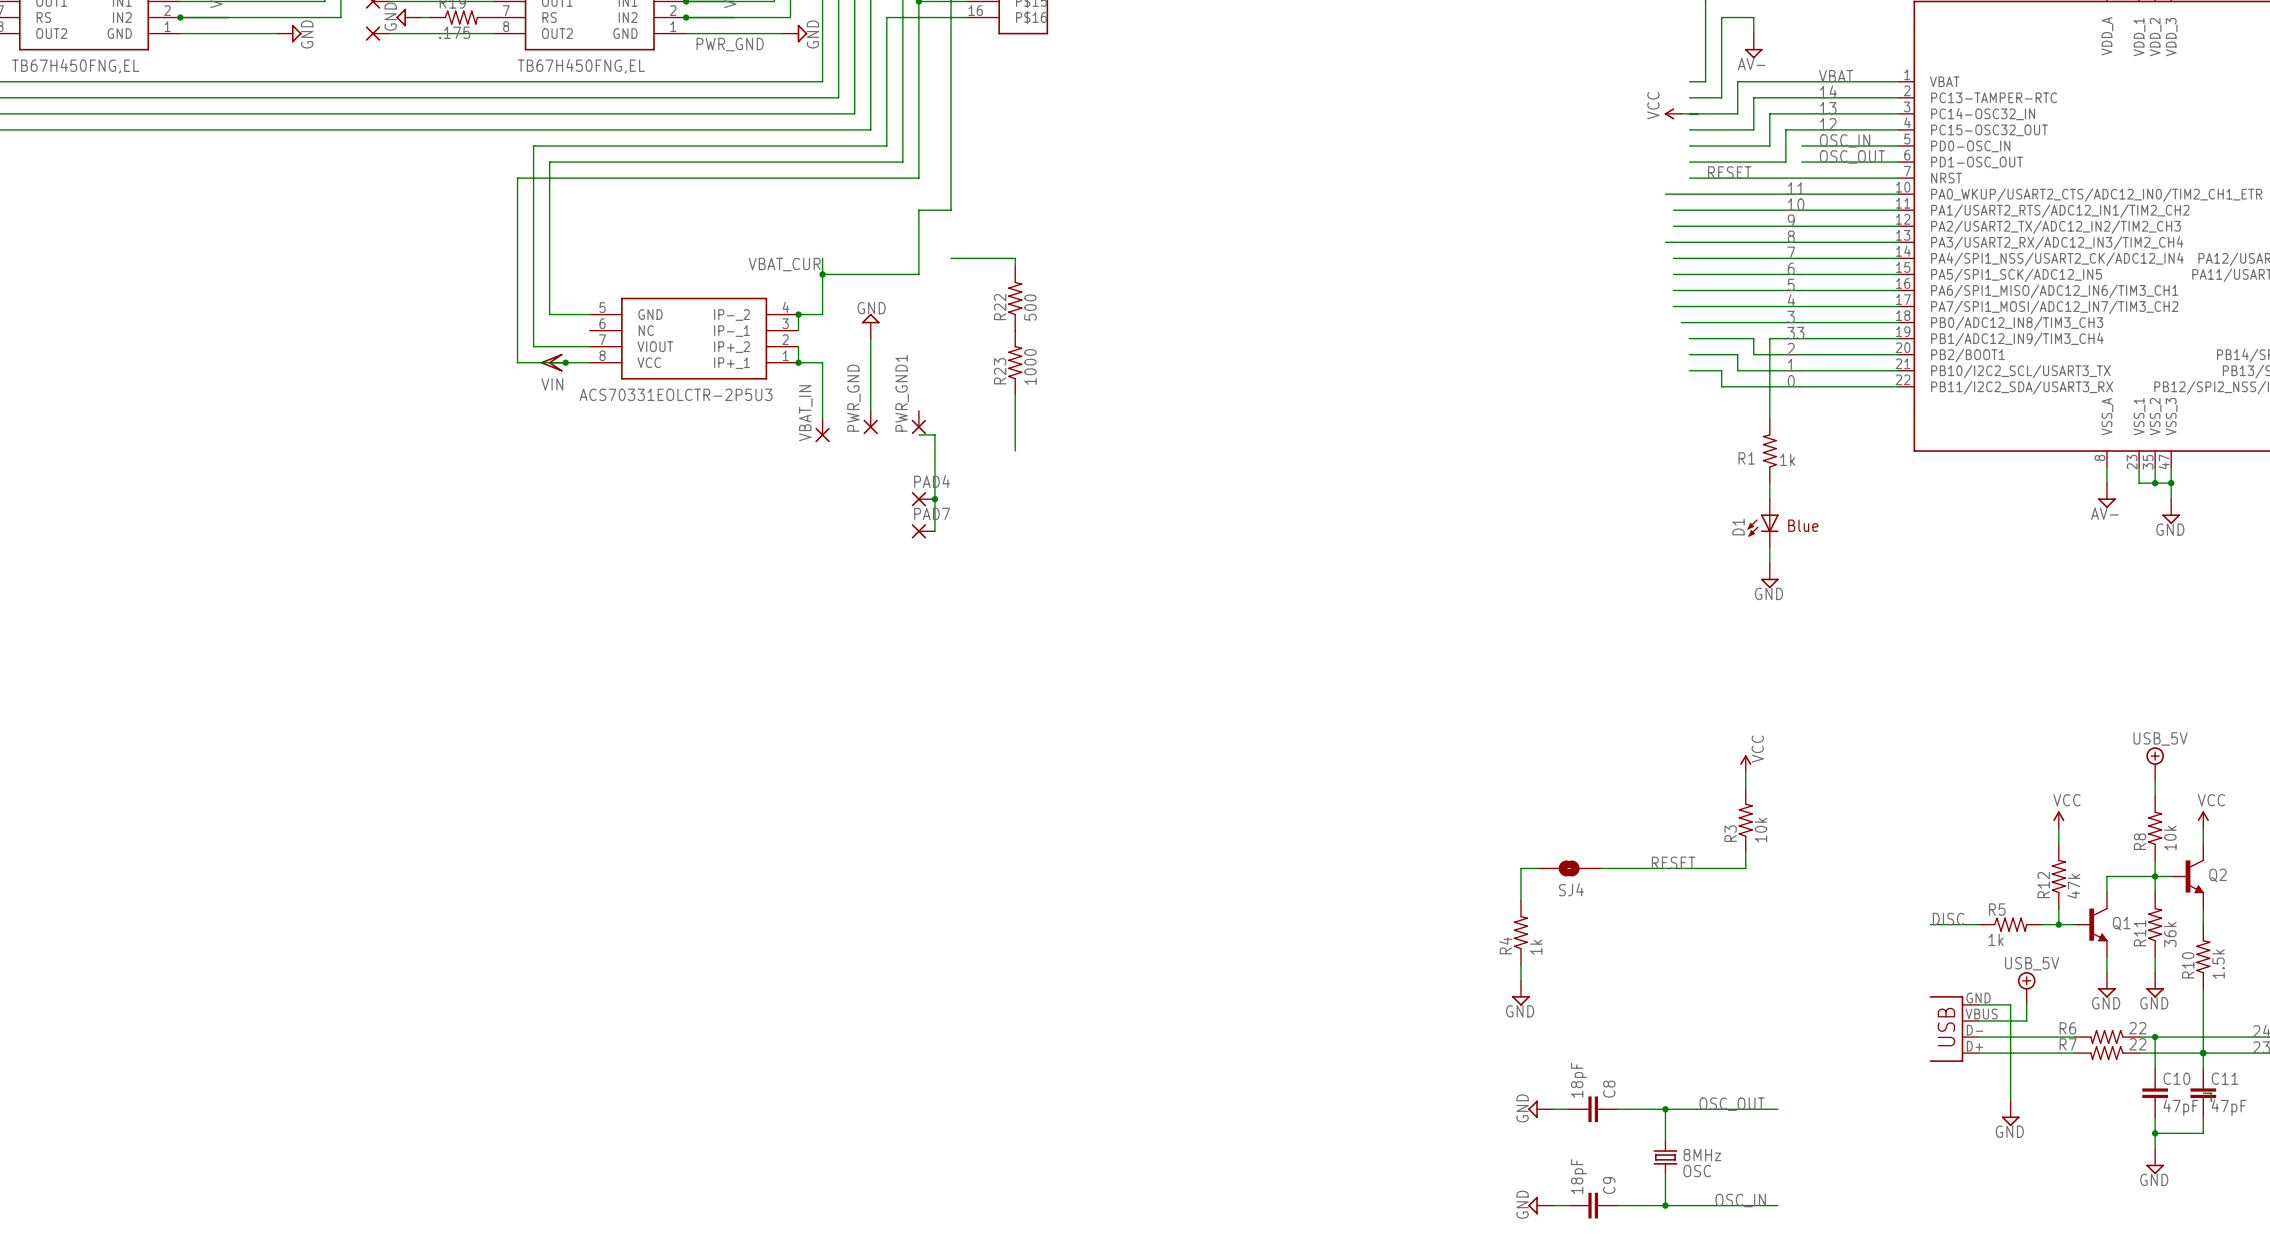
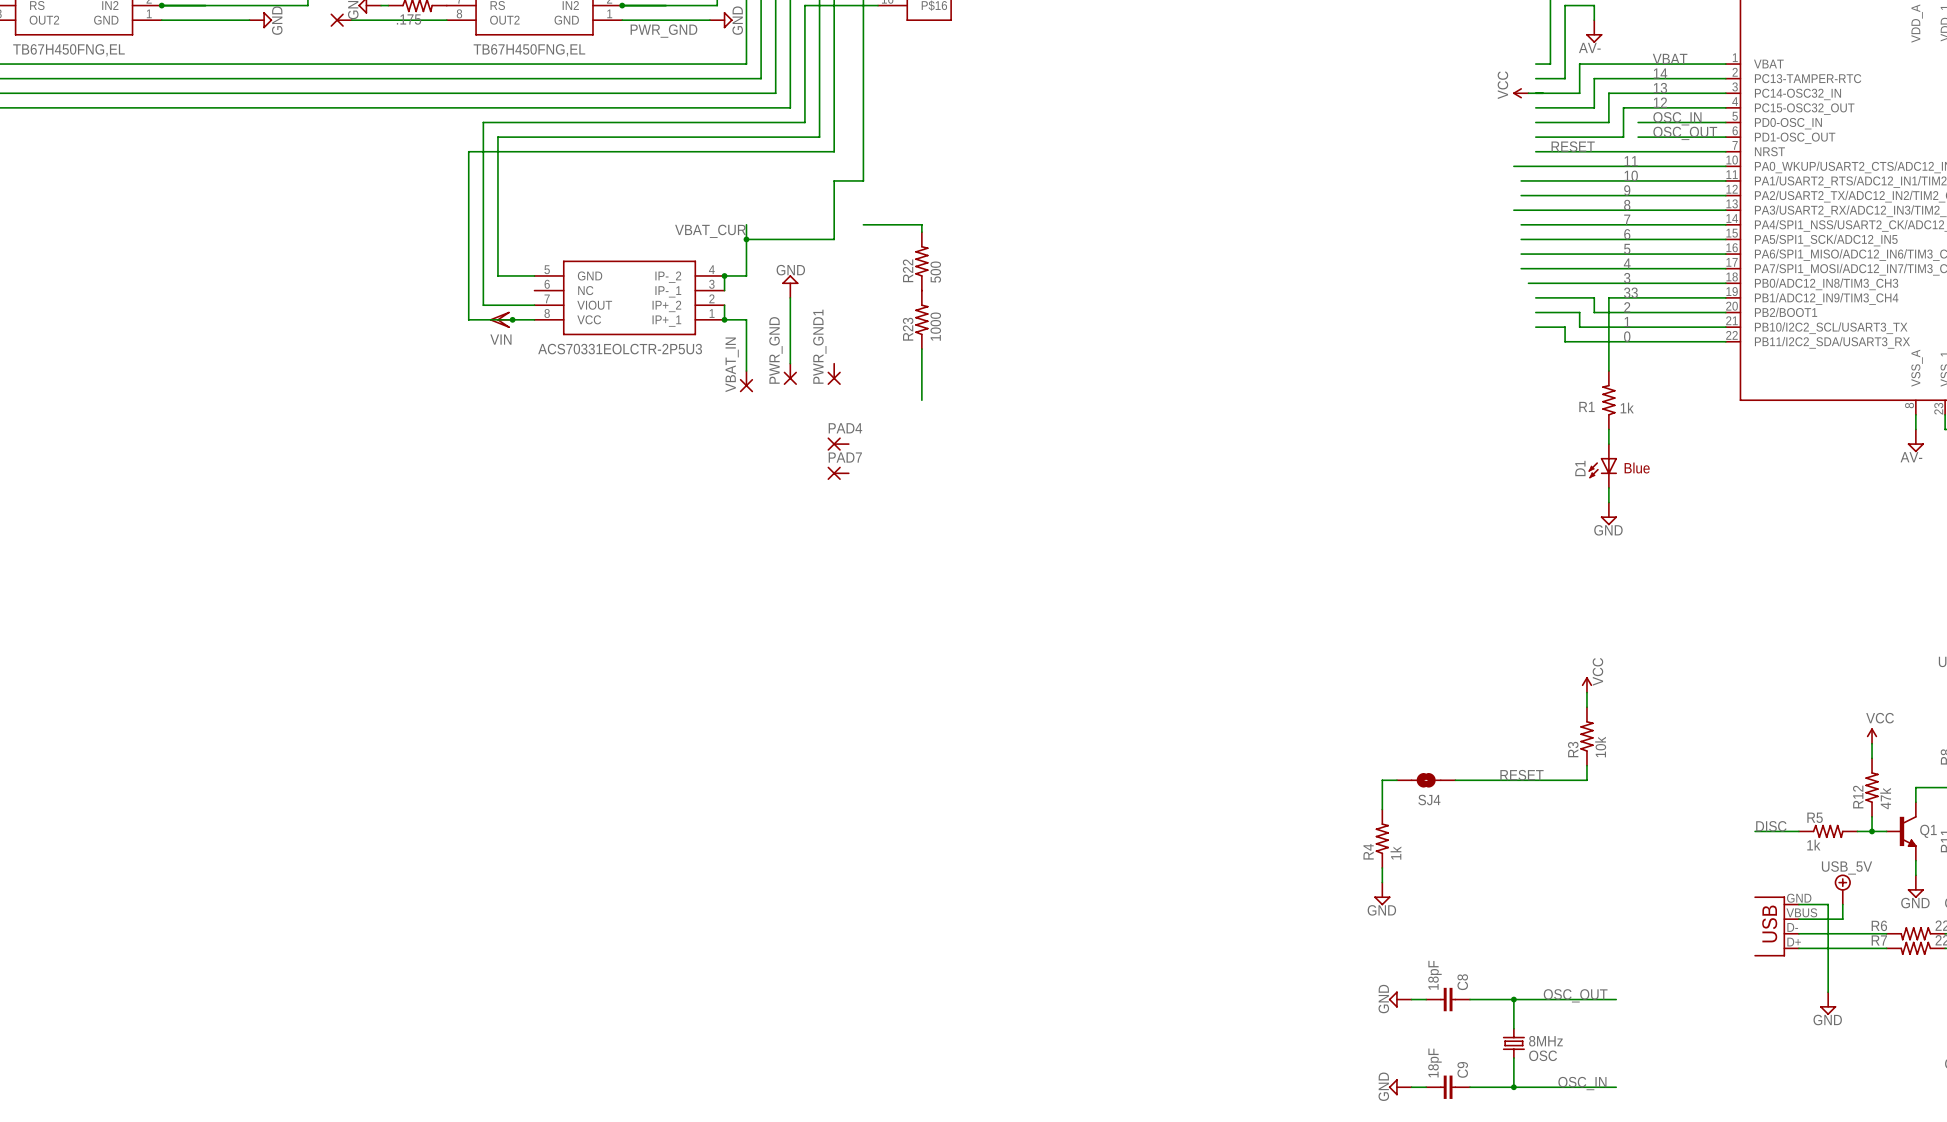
wire: (918, 434) (934, 434) (934, 531) -> none
junction: (934, 499) -> none

